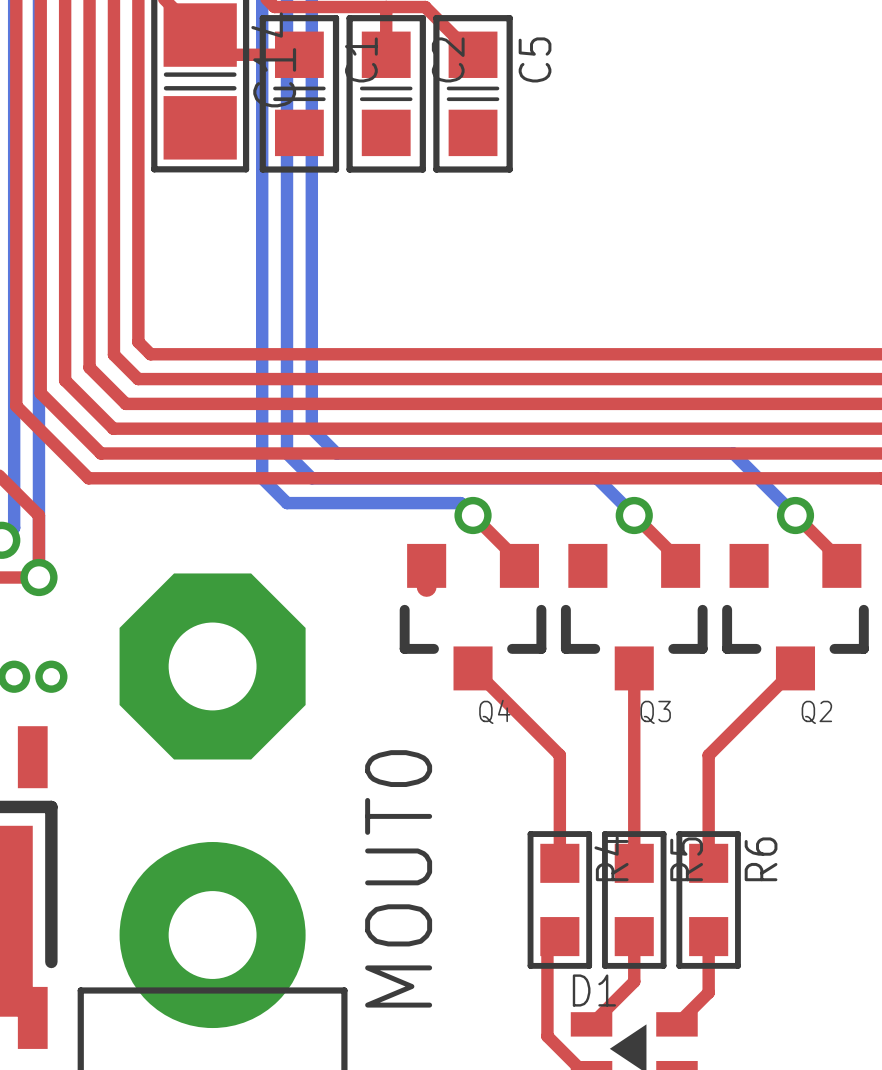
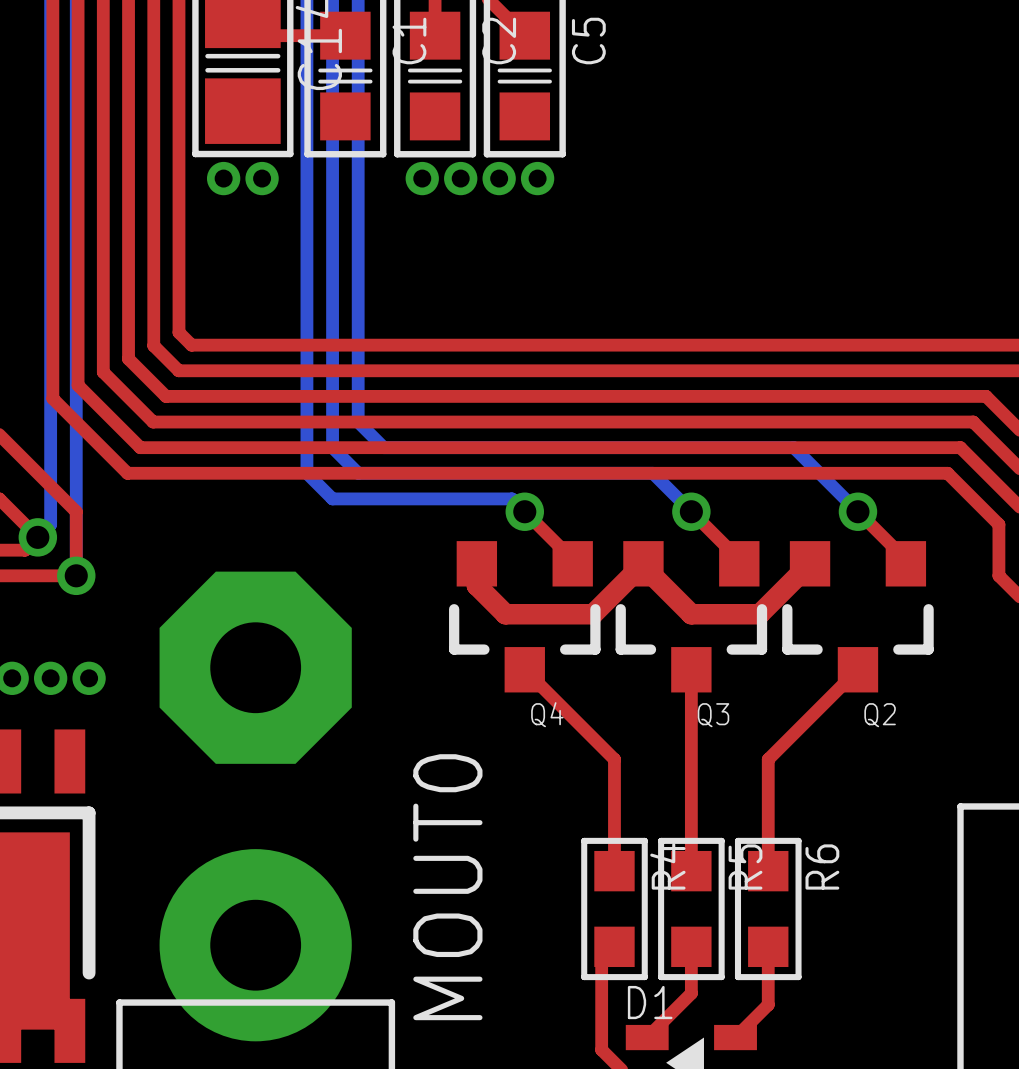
via: none -> (223, 178)
via: none -> (262, 178)
via: none -> (422, 178)
via: none -> (460, 178)
via: none -> (499, 178)
via: none -> (537, 178)
top track: none -> (810, 563) (759, 614) (691, 614) (643, 566) (643, 563) (592, 614) (505, 614) (476, 585)

